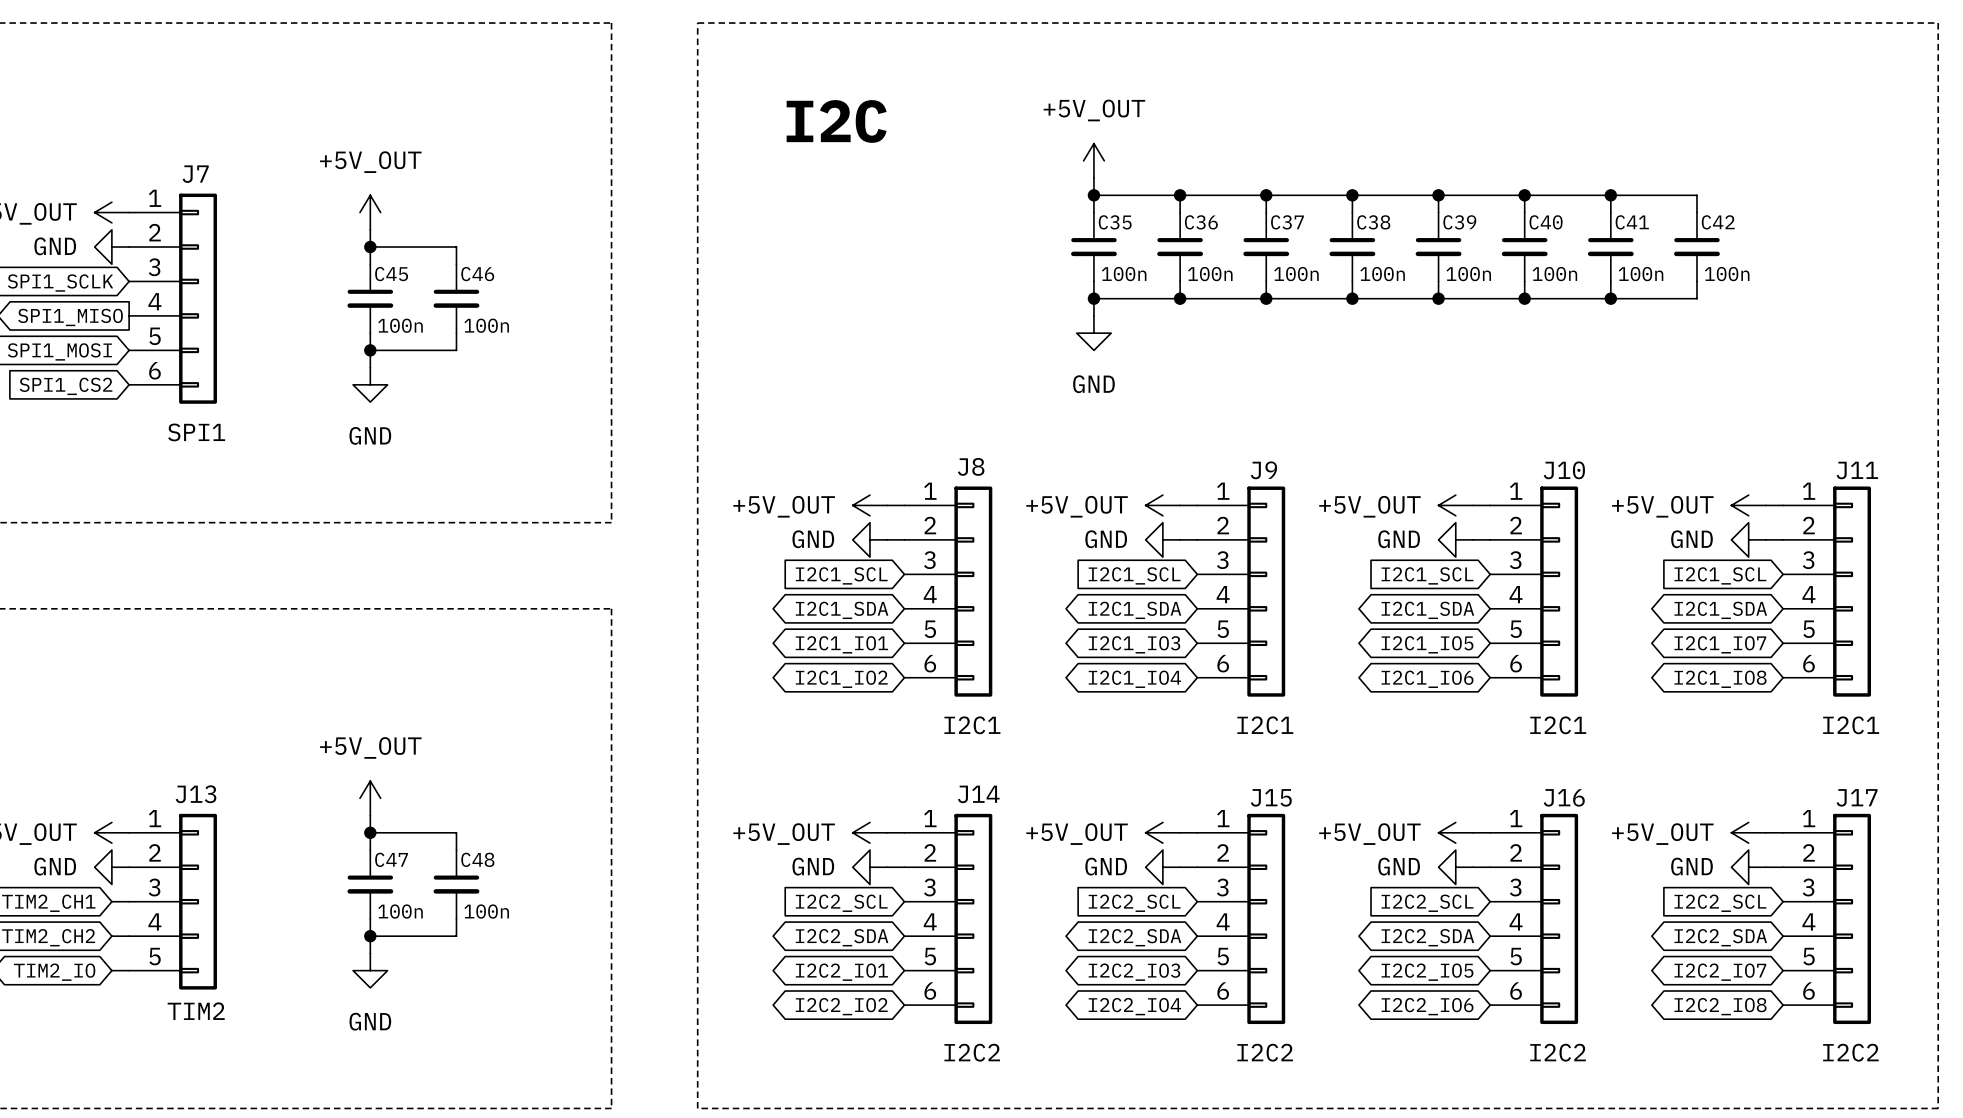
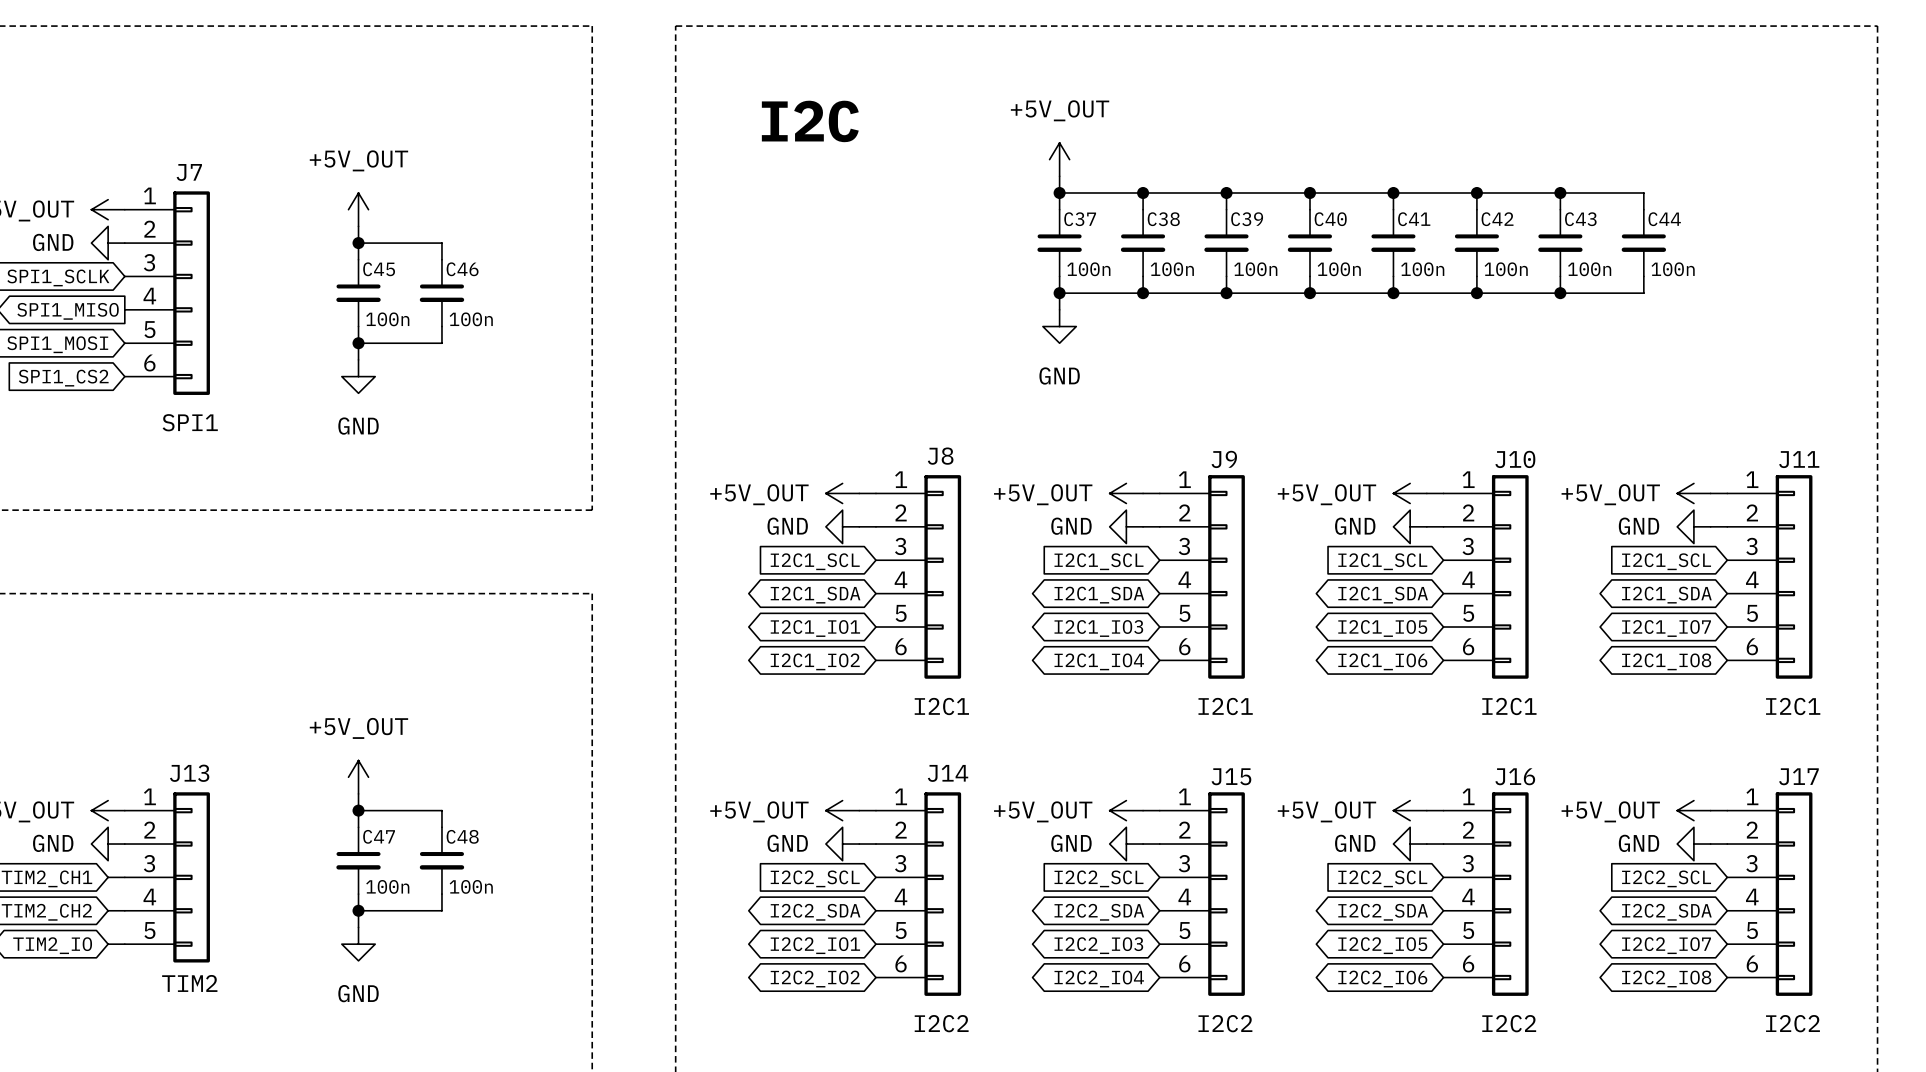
C35 name: C35 (1115, 222) -> C37 (1080, 219)
C36 name: C36 (1201, 222) -> C38 (1163, 219)
C37 name: C37 (1287, 222) -> C39 (1247, 219)
C38 name: C38 (1373, 222) -> C40 (1330, 219)
C39 name: C39 (1459, 222) -> C41 (1414, 219)
C40 name: C40 (1546, 222) -> C42 (1497, 219)
C41 name: C41 (1632, 222) -> C43 (1580, 219)
C42 name: C42 (1718, 222) -> C44 (1664, 219)

